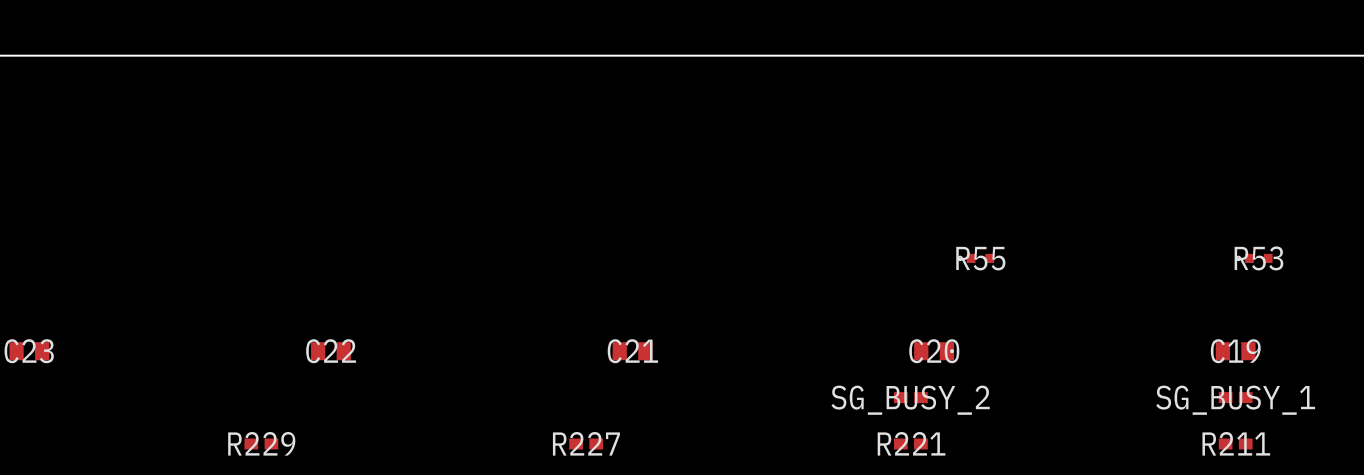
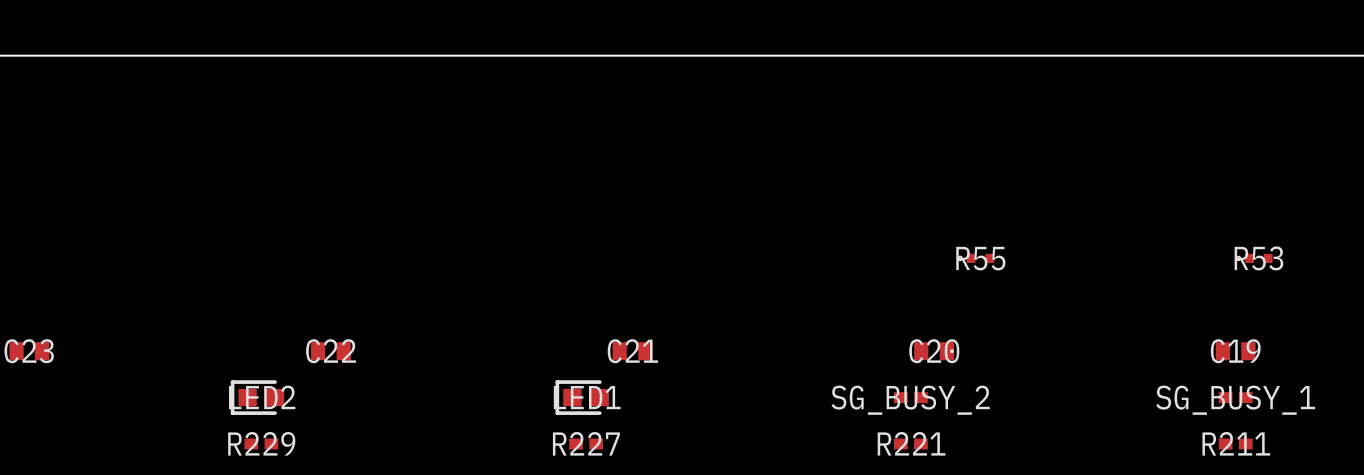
LED2: none -> (257, 397)
LED1: none -> (582, 397)

